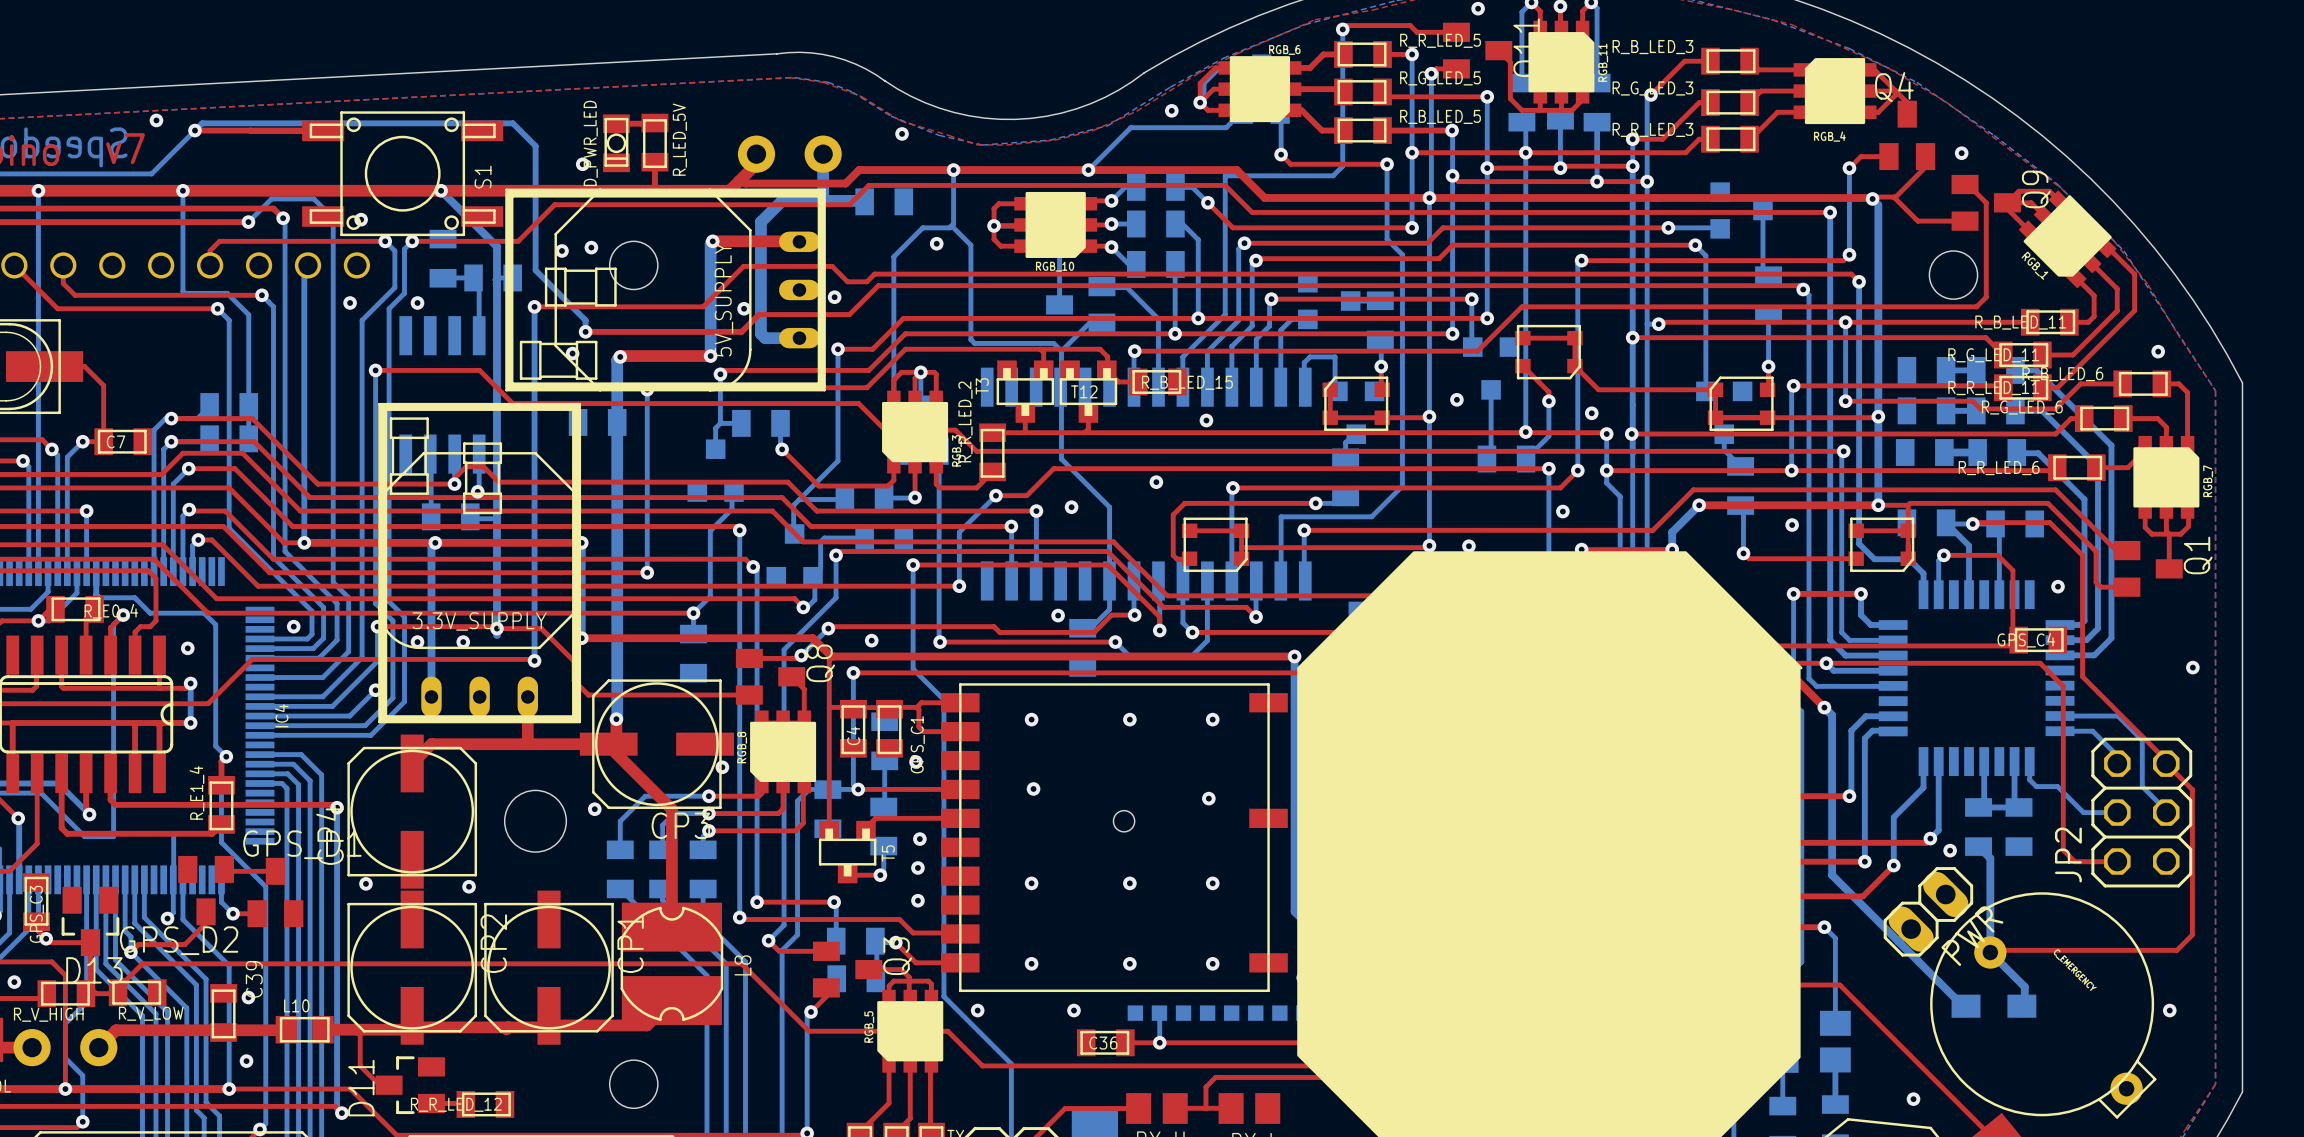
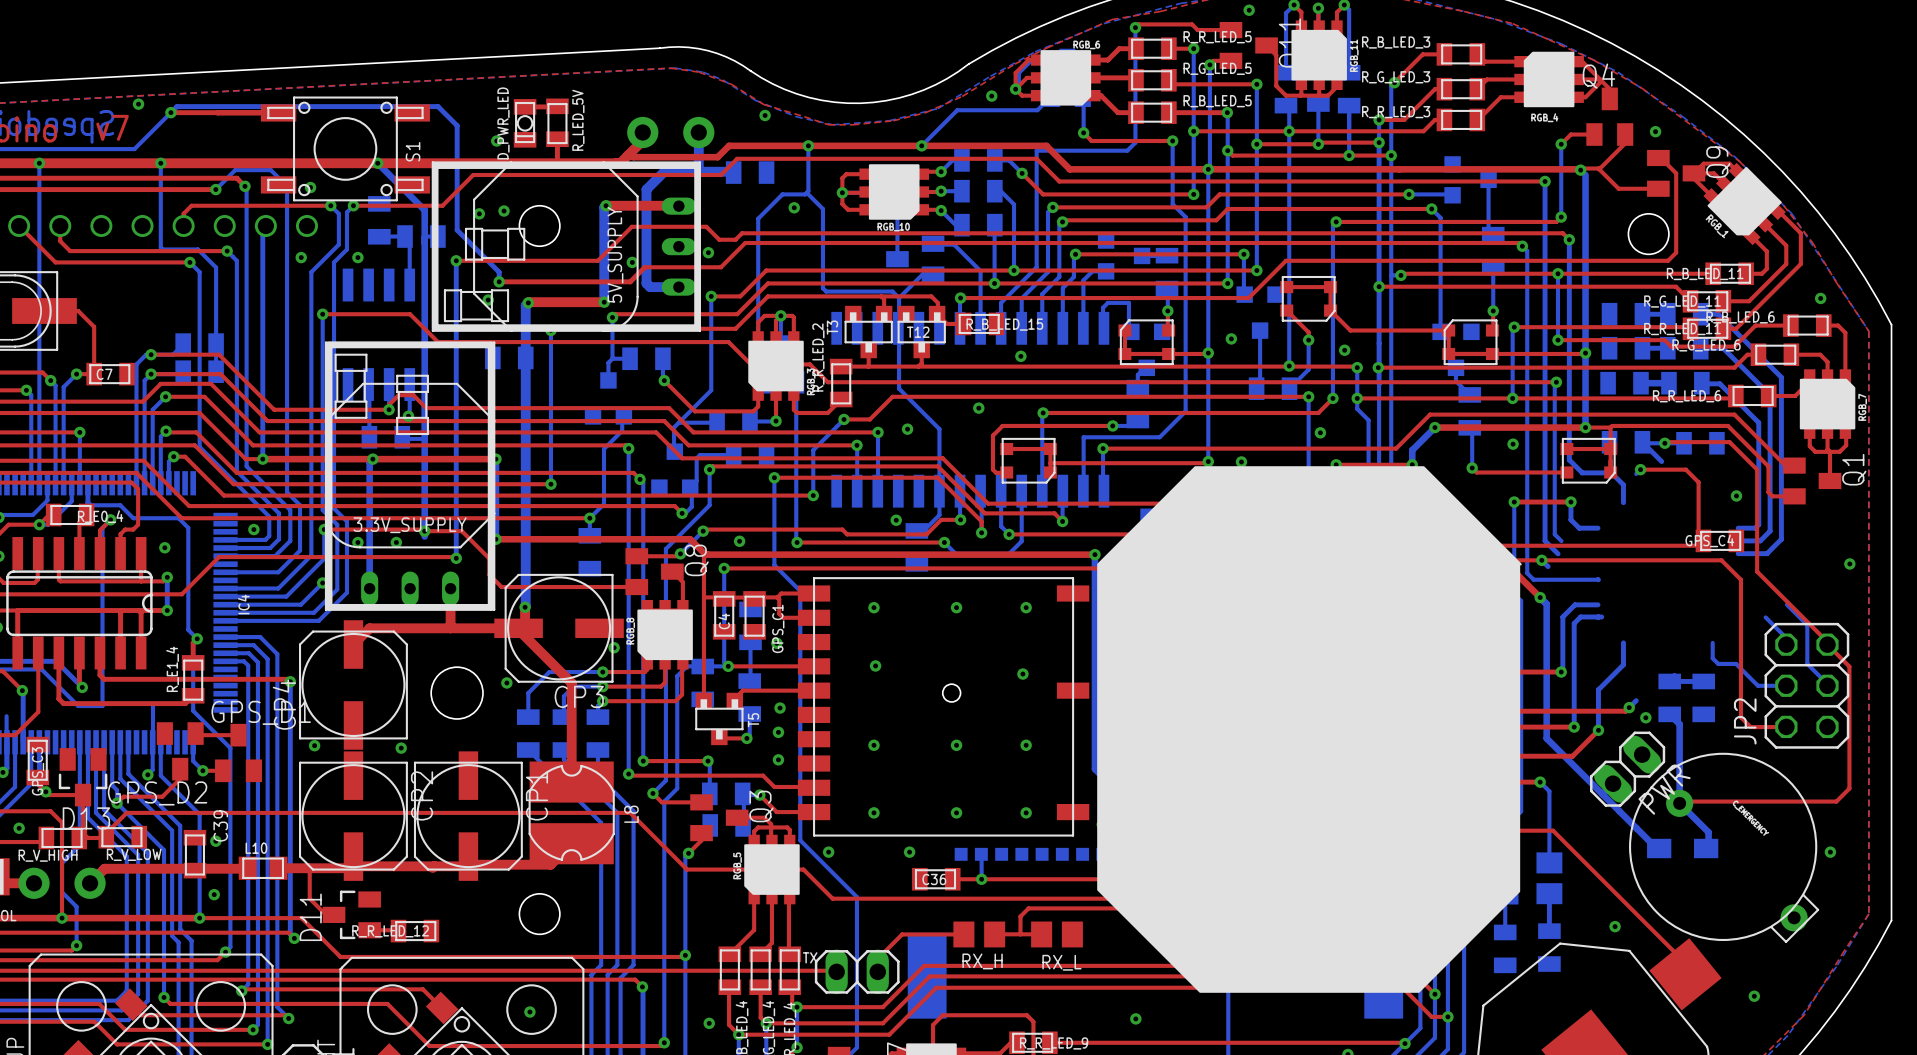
bottom track: (1999, 526) (1999, 594) -> none
bottom track: (1969, 545) (1969, 594) -> none
bottom track: (1938, 560) (1938, 594) -> none
bottom track: (1849, 640) (1893, 640) -> none
bottom track: (1845, 655) (1893, 655) -> none
bottom track: (1833, 670) (1893, 670) -> none
part: (1976, 678) -> none
bottom track: (2060, 716) (2118, 716) -> none
bottom track: (2060, 731) (2092, 731) -> none
bottom track: (1938, 761) (1938, 830) -> none
bottom track: (1984, 761) (1984, 800) -> none
bottom track: (2014, 761) (2014, 802) -> none

